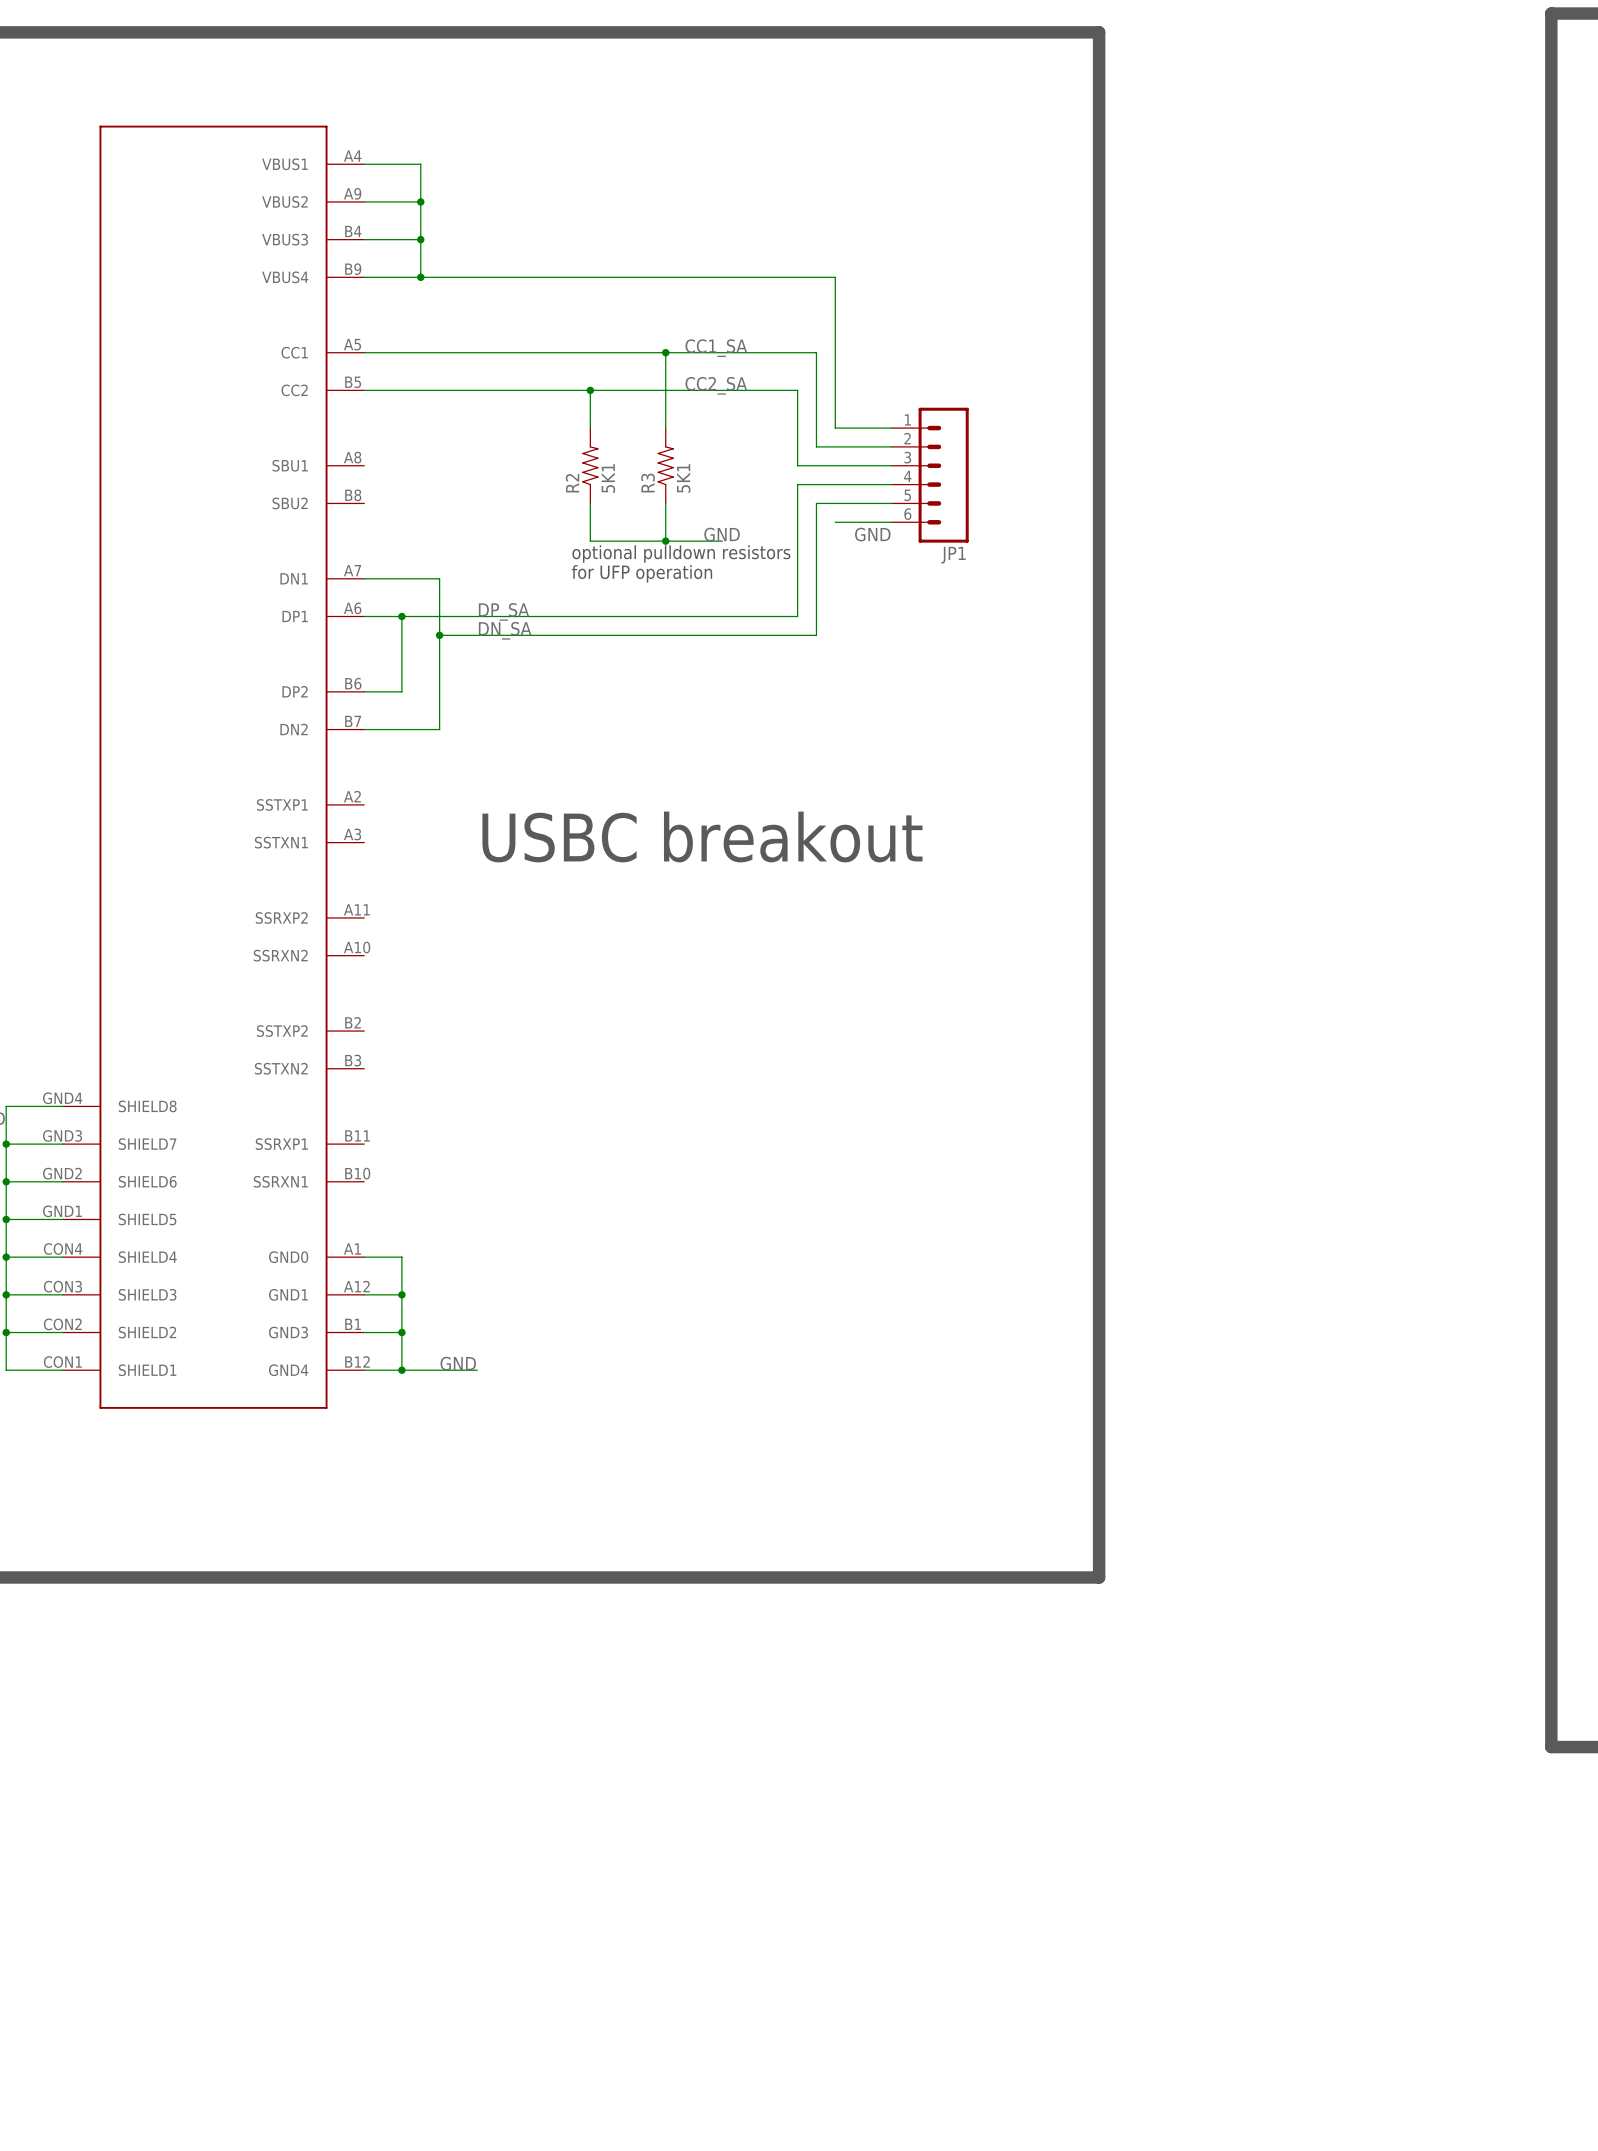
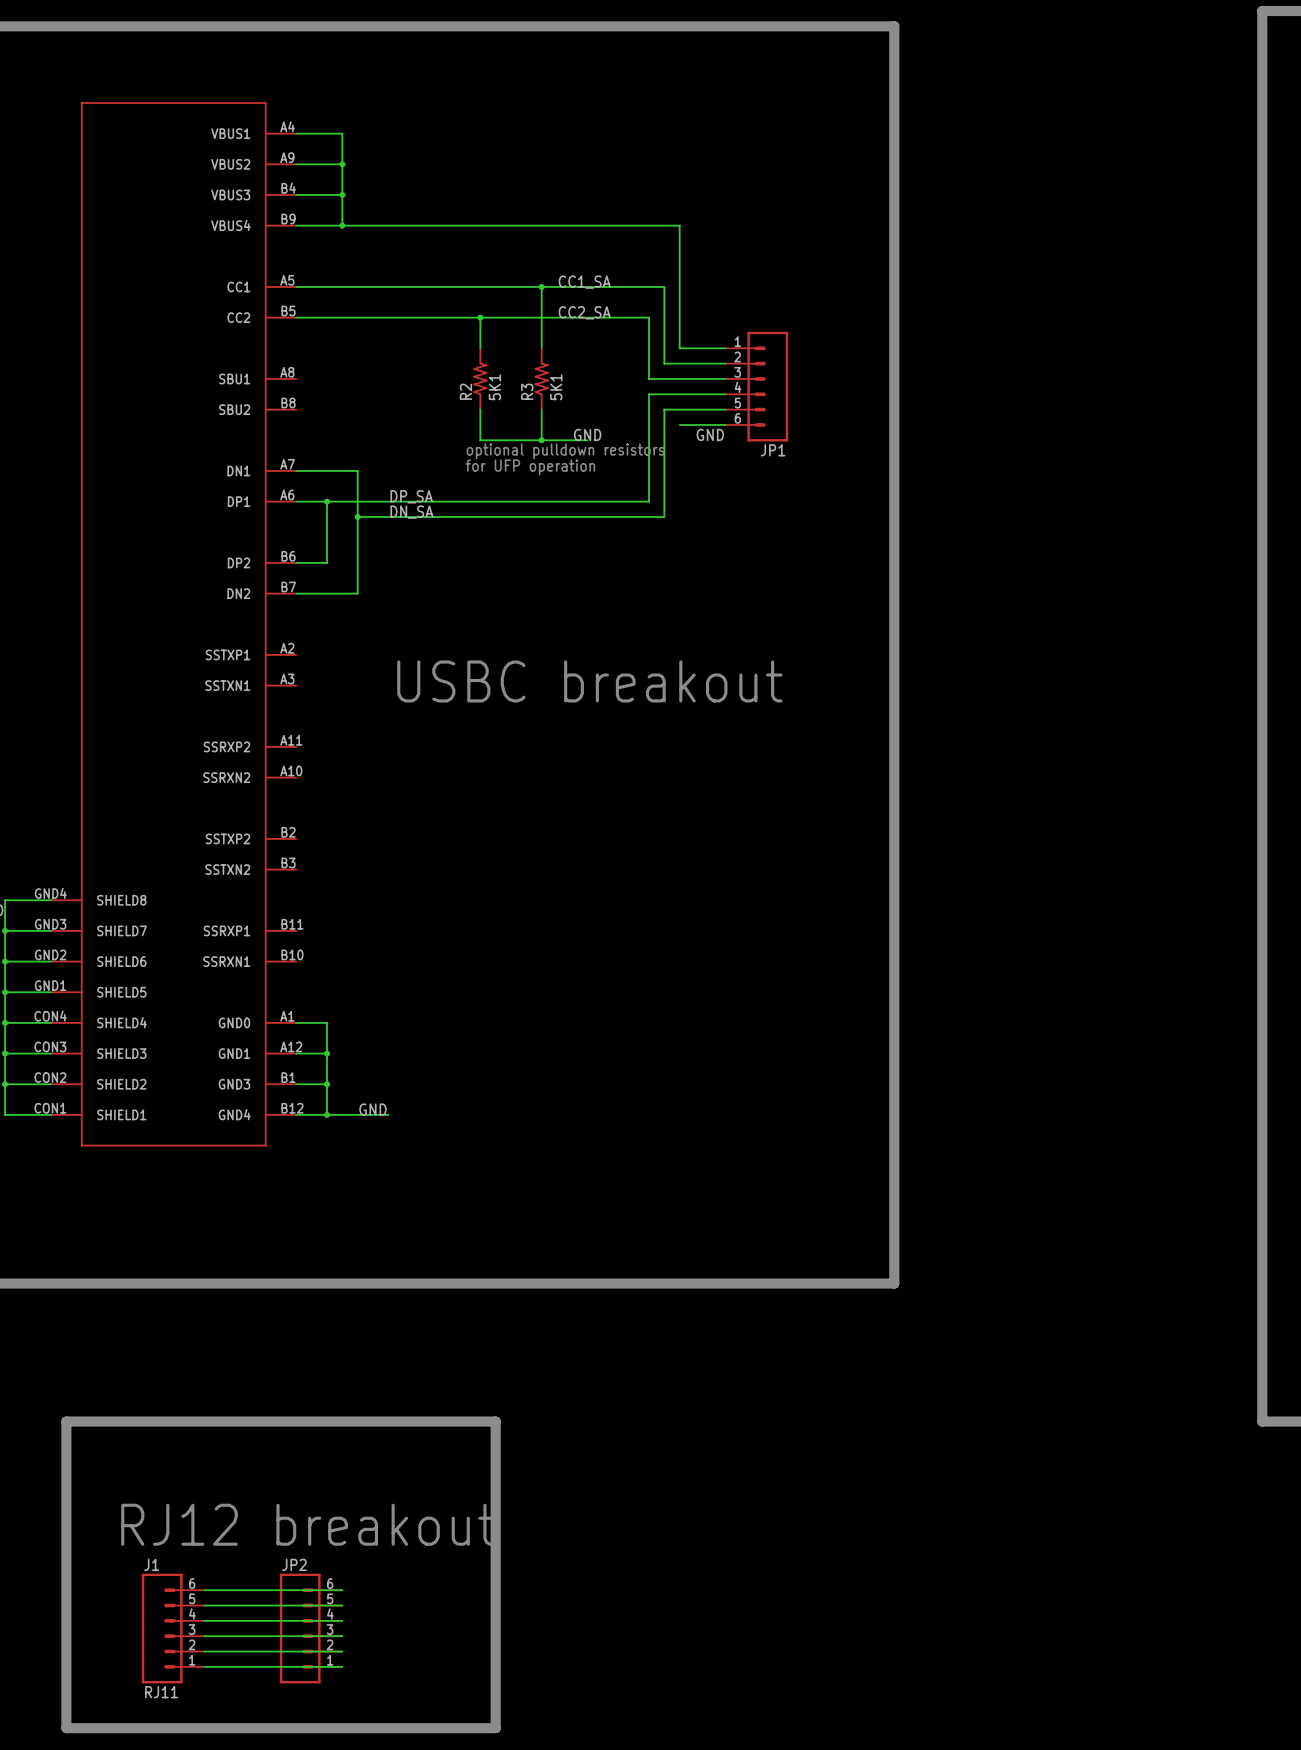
line: none -> (66, 1421) (495, 1421) (495, 1728) (66, 1728) (66, 1421)
text: none -> RJ12 breakout (308, 1524)
wire: none -> (204, 1590) (342, 1590)
wire: none -> (204, 1605) (342, 1605)
wire: none -> (204, 1620) (342, 1620)
J1: none -> RJ11 (173, 1628)
JP2: none -> (311, 1628)
wire: none -> (204, 1636) (342, 1636)
wire: none -> (204, 1651) (342, 1651)
wire: none -> (204, 1666) (342, 1666)

